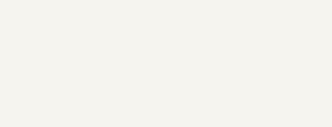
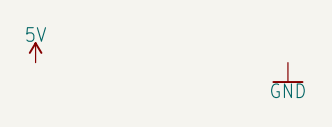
power symbol: none -> 5V (35, 52)
power symbol: none -> GND (287, 72)

